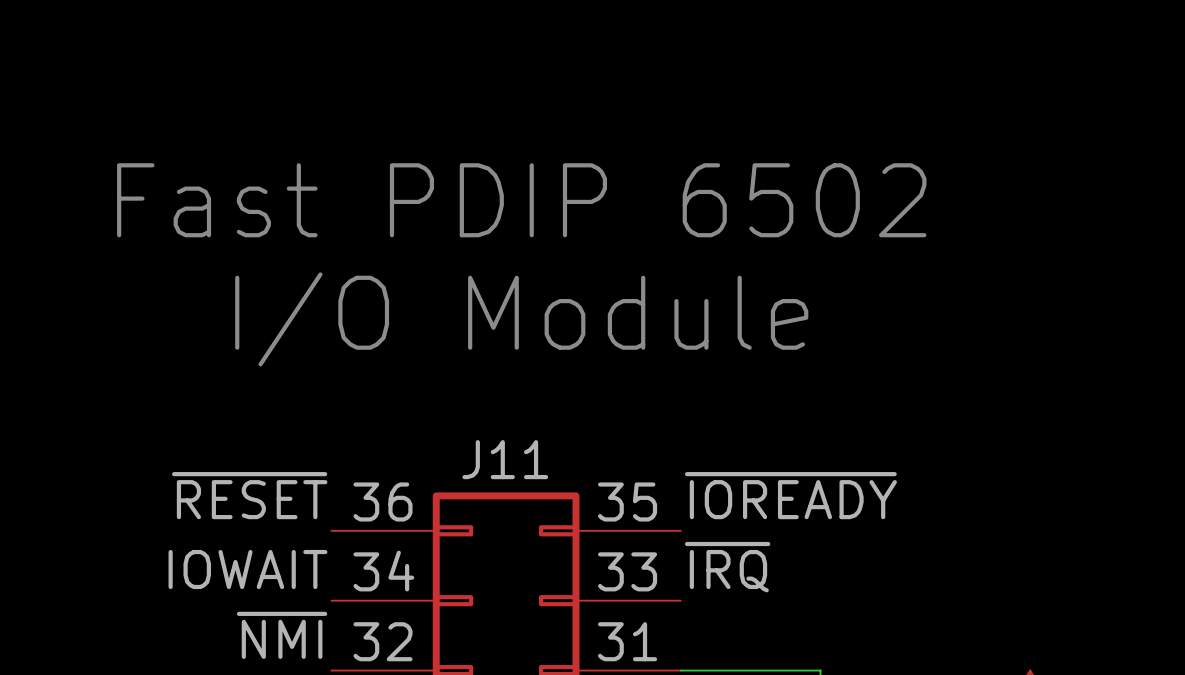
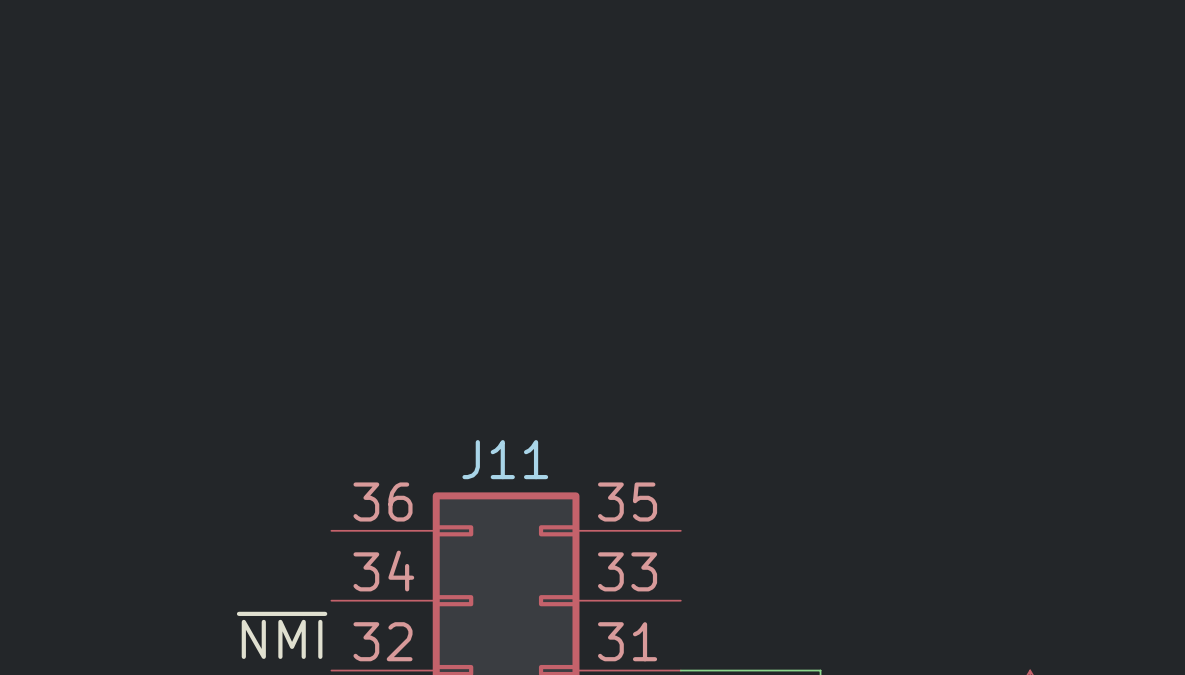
text: Fast PDIP 6502 (521, 200) -> none
text: I/O Module (521, 319) -> none
label: ~{RESET} (249, 495) -> none
label: ~{IOREADY} (790, 495) -> none
label: ~{IRQ} (727, 567) -> none
label: IOWAIT (247, 569) -> none

